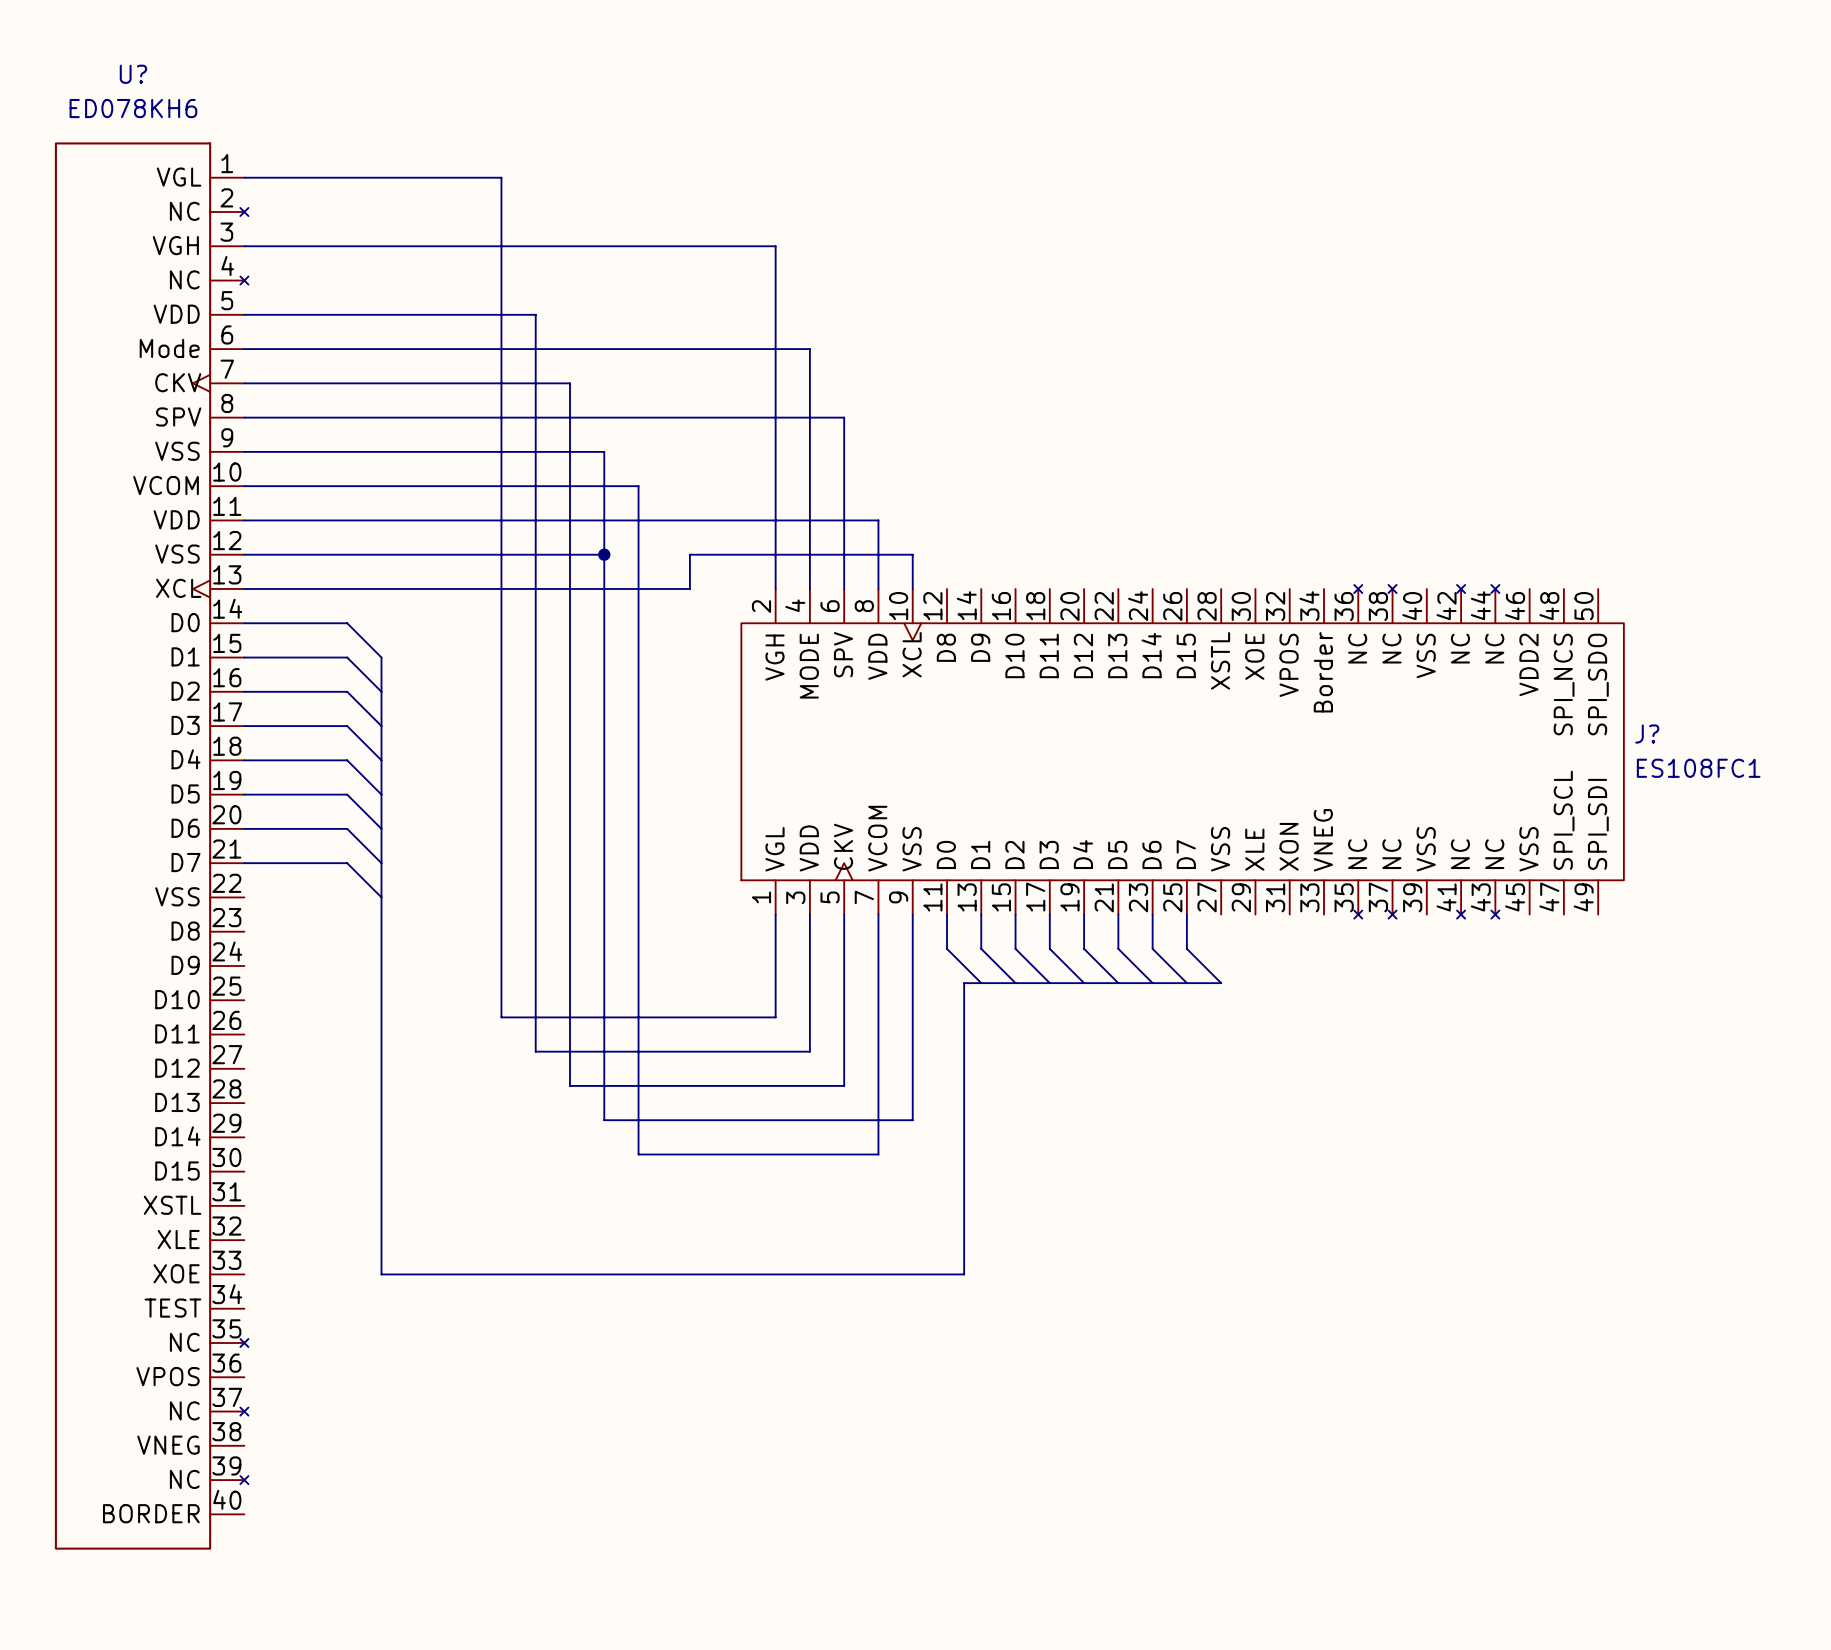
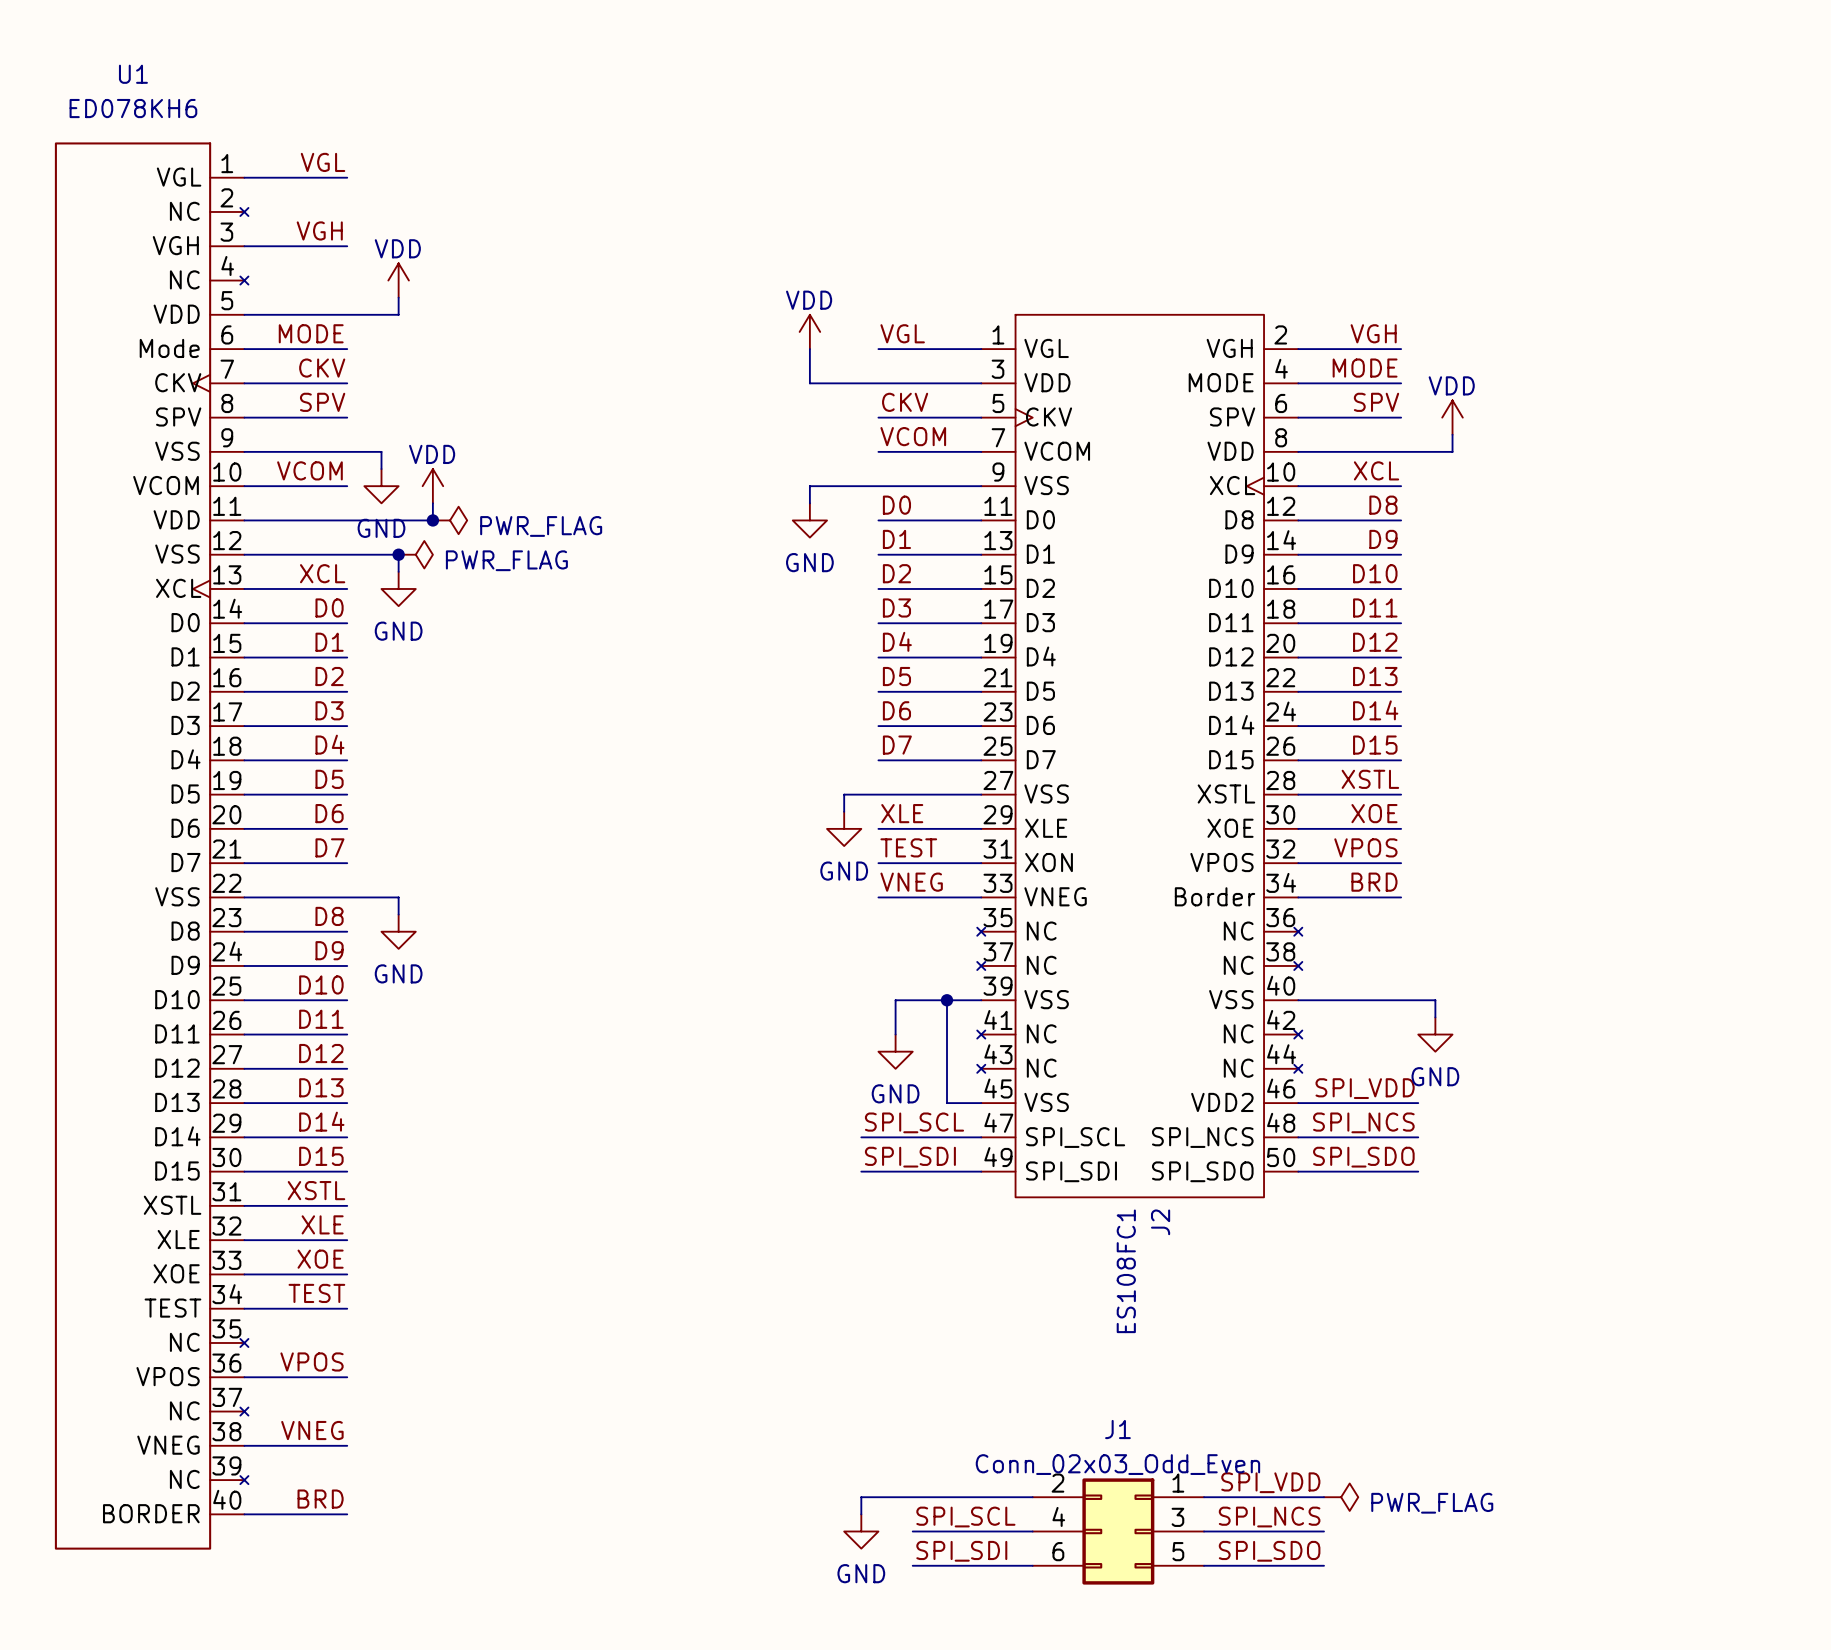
U? name: U? (133, 74) -> U1 (133, 74)
label: none -> VGL (323, 162)
wire: (347, 177) (501, 177) (501, 1017) (775, 1017) (775, 914) -> none
label: none -> VGH (319, 230)
wire: (347, 246) (775, 246) (775, 588) -> none
power symbol: none -> VDD (398, 280)
wire: (398, 314) (535, 314) (535, 1051) (809, 1051) (809, 914) -> (398, 314) (398, 297)
power symbol: none -> VDD (809, 331)
label: none -> MODE (311, 333)
label: none -> VGL (902, 333)
label: none -> VGH (1373, 333)
wire: (347, 349) (809, 349) -> none
wire: none -> (878, 349) (981, 349)
wire: none -> (1298, 349) (1401, 349)
label: none -> CKV (322, 368)
label: none -> MODE (1365, 368)
wire: (347, 383) (570, 383) (570, 1085) (844, 1085) (844, 914) -> none
wire: (809, 383) (809, 486) -> (809, 383) (981, 383)
wire: none -> (1298, 383) (1401, 383)
label: none -> SPV (322, 402)
label: none -> CKV (905, 402)
label: none -> SPV (1376, 402)
wire: (347, 417) (844, 417) (844, 588) -> none
wire: none -> (878, 417) (981, 417)
wire: none -> (1298, 417) (1401, 417)
power symbol: none -> VDD (1452, 417)
wire: none -> (1452, 434) (1452, 451) (1298, 451)
label: none -> VCOM (913, 436)
wire: (381, 451) (604, 451) (604, 1120) (912, 1120) (912, 914) -> (381, 451) (381, 469)
wire: none -> (878, 451) (981, 451)
label: none -> VCOM (309, 470)
label: none -> XCL (1376, 470)
wire: (347, 486) (638, 486) (638, 1154) (878, 1154) (878, 914) -> none
power symbol: none -> GND (381, 486)
power symbol: none -> VDD (432, 486)
wire: none -> (809, 486) (981, 486)
wire: none -> (1298, 486) (1401, 486)
wire: (809, 503) (809, 588) -> none
label: none -> D0 (896, 505)
label: none -> D8 (1383, 505)
wire: (432, 520) (878, 520) (878, 588) -> (432, 520) (432, 503)
junction: none -> (432, 520)
power symbol: none -> PWR_FLAG (450, 520)
power symbol: none -> GND (809, 520)
wire: none -> (878, 520) (981, 520)
wire: none -> (1298, 520) (1401, 520)
label: none -> D1 (896, 539)
label: none -> D9 (1383, 539)
wire: (398, 554) (604, 554) -> (398, 554) (398, 571)
junction: none -> (398, 554)
power symbol: none -> PWR_FLAG (415, 554)
junction: (604, 554) -> none
wire: (878, 554) (689, 554) (689, 588) (347, 588) -> none
wire: (912, 554) (912, 588) -> (912, 554) (981, 554)
wire: none -> (1298, 554) (1401, 554)
label: none -> XCL (322, 573)
label: none -> D2 (896, 573)
label: none -> D10 (1375, 573)
power symbol: none -> GND (398, 588)
wire: none -> (878, 588) (981, 588)
wire: none -> (1298, 588) (1401, 588)
label: none -> D0 (329, 607)
label: none -> D3 (896, 607)
label: none -> D11 (1375, 607)
wire: (347, 623) (381, 657) -> none
label: none -> D4 (897, 641)
label: none -> D1 (329, 642)
label: none -> D12 (1375, 642)
wire: (347, 657) (381, 691) -> none
bus: (381, 657) (381, 1274) (964, 1274) (964, 983) (1221, 983) -> none
wire: none -> (878, 657) (981, 657)
wire: none -> (1298, 657) (1401, 657)
label: none -> D2 (329, 676)
label: none -> D5 (896, 676)
label: none -> D13 (1375, 676)
wire: (347, 691) (381, 726) -> none
wire: none -> (878, 691) (981, 691)
wire: none -> (1298, 691) (1401, 691)
label: none -> D3 (329, 710)
label: none -> D6 (896, 710)
label: none -> D14 (1375, 710)
wire: (347, 726) (381, 760) -> none
wire: none -> (878, 726) (981, 726)
wire: none -> (1298, 726) (1401, 726)
label: none -> D4 (329, 744)
label: none -> D7 (897, 745)
label: none -> D15 (1375, 745)
J?: ES108FC1 (1182, 751) -> none
J2: none -> ES108FC1 (1139, 756)
wire: (347, 760) (381, 794) -> none
wire: none -> (878, 760) (981, 760)
wire: none -> (1298, 760) (1401, 760)
label: none -> D5 (329, 779)
label: none -> XSTL (1370, 779)
wire: (347, 794) (381, 828) -> none
wire: none -> (981, 794) (844, 794) (844, 811)
wire: none -> (1298, 794) (1401, 794)
label: none -> D6 (329, 813)
label: none -> XLE (902, 813)
label: none -> XOE (1374, 813)
wire: (347, 828) (381, 863) -> none
power symbol: none -> GND (844, 828)
wire: none -> (878, 828) (981, 828)
wire: none -> (1298, 828) (1401, 828)
label: none -> D7 (329, 847)
label: none -> TEST (908, 847)
label: none -> VPOS (1365, 847)
wire: (347, 863) (381, 897) -> none
wire: none -> (878, 863) (981, 863)
wire: none -> (1298, 863) (1401, 863)
label: none -> VNEG (911, 882)
label: none -> BRD (1374, 882)
wire: none -> (244, 897) (398, 897) (398, 914)
wire: none -> (878, 897) (981, 897)
wire: none -> (1298, 897) (1401, 897)
wire: (947, 914) (947, 948) (981, 983) -> none
wire: (981, 914) (981, 948) (1015, 983) -> none
wire: (1015, 914) (1015, 948) (1049, 983) -> none
wire: (1049, 914) (1049, 948) (1084, 983) -> none
wire: (1084, 914) (1084, 948) (1118, 983) -> none
wire: (1118, 914) (1118, 948) (1152, 983) -> none
wire: (1152, 914) (1152, 948) (1186, 983) -> none
wire: (1186, 914) (1186, 948) (1221, 983) -> none
label: none -> D8 (329, 916)
wire: none -> (244, 931) (347, 931)
power symbol: none -> GND (398, 931)
label: none -> D9 (329, 950)
wire: none -> (244, 965) (347, 965)
label: none -> D10 (321, 984)
wire: none -> (244, 1000) (347, 1000)
wire: none -> (947, 1000) (947, 1103) (981, 1103)
junction: none -> (947, 1000)
wire: none -> (981, 1000) (895, 1000) (895, 1034)
wire: none -> (1298, 1000) (1435, 1000) (1435, 1017)
label: none -> D11 (321, 1019)
wire: none -> (244, 1034) (347, 1034)
power symbol: none -> GND (1435, 1034)
power symbol: none -> GND (895, 1051)
label: none -> D12 (321, 1053)
wire: none -> (244, 1068) (347, 1068)
label: none -> D13 (321, 1087)
label: none -> SPI_VDD (1365, 1088)
wire: none -> (244, 1103) (347, 1103)
wire: none -> (1298, 1103) (1418, 1103)
label: none -> D14 (321, 1121)
label: none -> SPI_SCL (914, 1122)
label: none -> SPI_NCS (1363, 1122)
wire: none -> (244, 1137) (347, 1137)
wire: none -> (861, 1137) (981, 1137)
wire: none -> (1298, 1137) (1418, 1137)
label: none -> D15 (321, 1156)
label: none -> SPI_SDI (910, 1157)
label: none -> SPI_SDO (1363, 1157)
wire: none -> (244, 1171) (347, 1171)
wire: none -> (861, 1171) (981, 1171)
wire: none -> (1298, 1171) (1418, 1171)
label: none -> XSTL (316, 1190)
wire: none -> (244, 1205) (347, 1205)
label: none -> XLE (322, 1224)
wire: none -> (244, 1240) (347, 1240)
label: none -> XOE (320, 1259)
wire: none -> (244, 1274) (347, 1274)
label: none -> TEST (316, 1293)
wire: none -> (244, 1308) (347, 1308)
label: none -> VPOS (312, 1361)
wire: none -> (244, 1377) (347, 1377)
label: none -> VNEG (312, 1430)
wire: none -> (244, 1445) (347, 1445)
label: none -> SPI_VDD (1270, 1482)
wire: none -> (1032, 1497) (861, 1497) (861, 1514)
wire: none -> (1204, 1497) (1324, 1497)
power symbol: none -> PWR_FLAG (1341, 1497)
label: none -> BRD (320, 1499)
wire: none -> (244, 1514) (347, 1514)
label: none -> SPI_SCL (965, 1517)
label: none -> SPI_NCS (1269, 1517)
power symbol: none -> GND (861, 1531)
wire: none -> (912, 1531) (1032, 1531)
J1: none -> Conn_02x03_Odd_Even (1118, 1531)
wire: none -> (1204, 1531) (1324, 1531)
label: none -> SPI_SDI (961, 1551)
label: none -> SPI_SDO (1269, 1551)
wire: none -> (912, 1565) (1032, 1565)
wire: none -> (1204, 1565) (1324, 1565)

